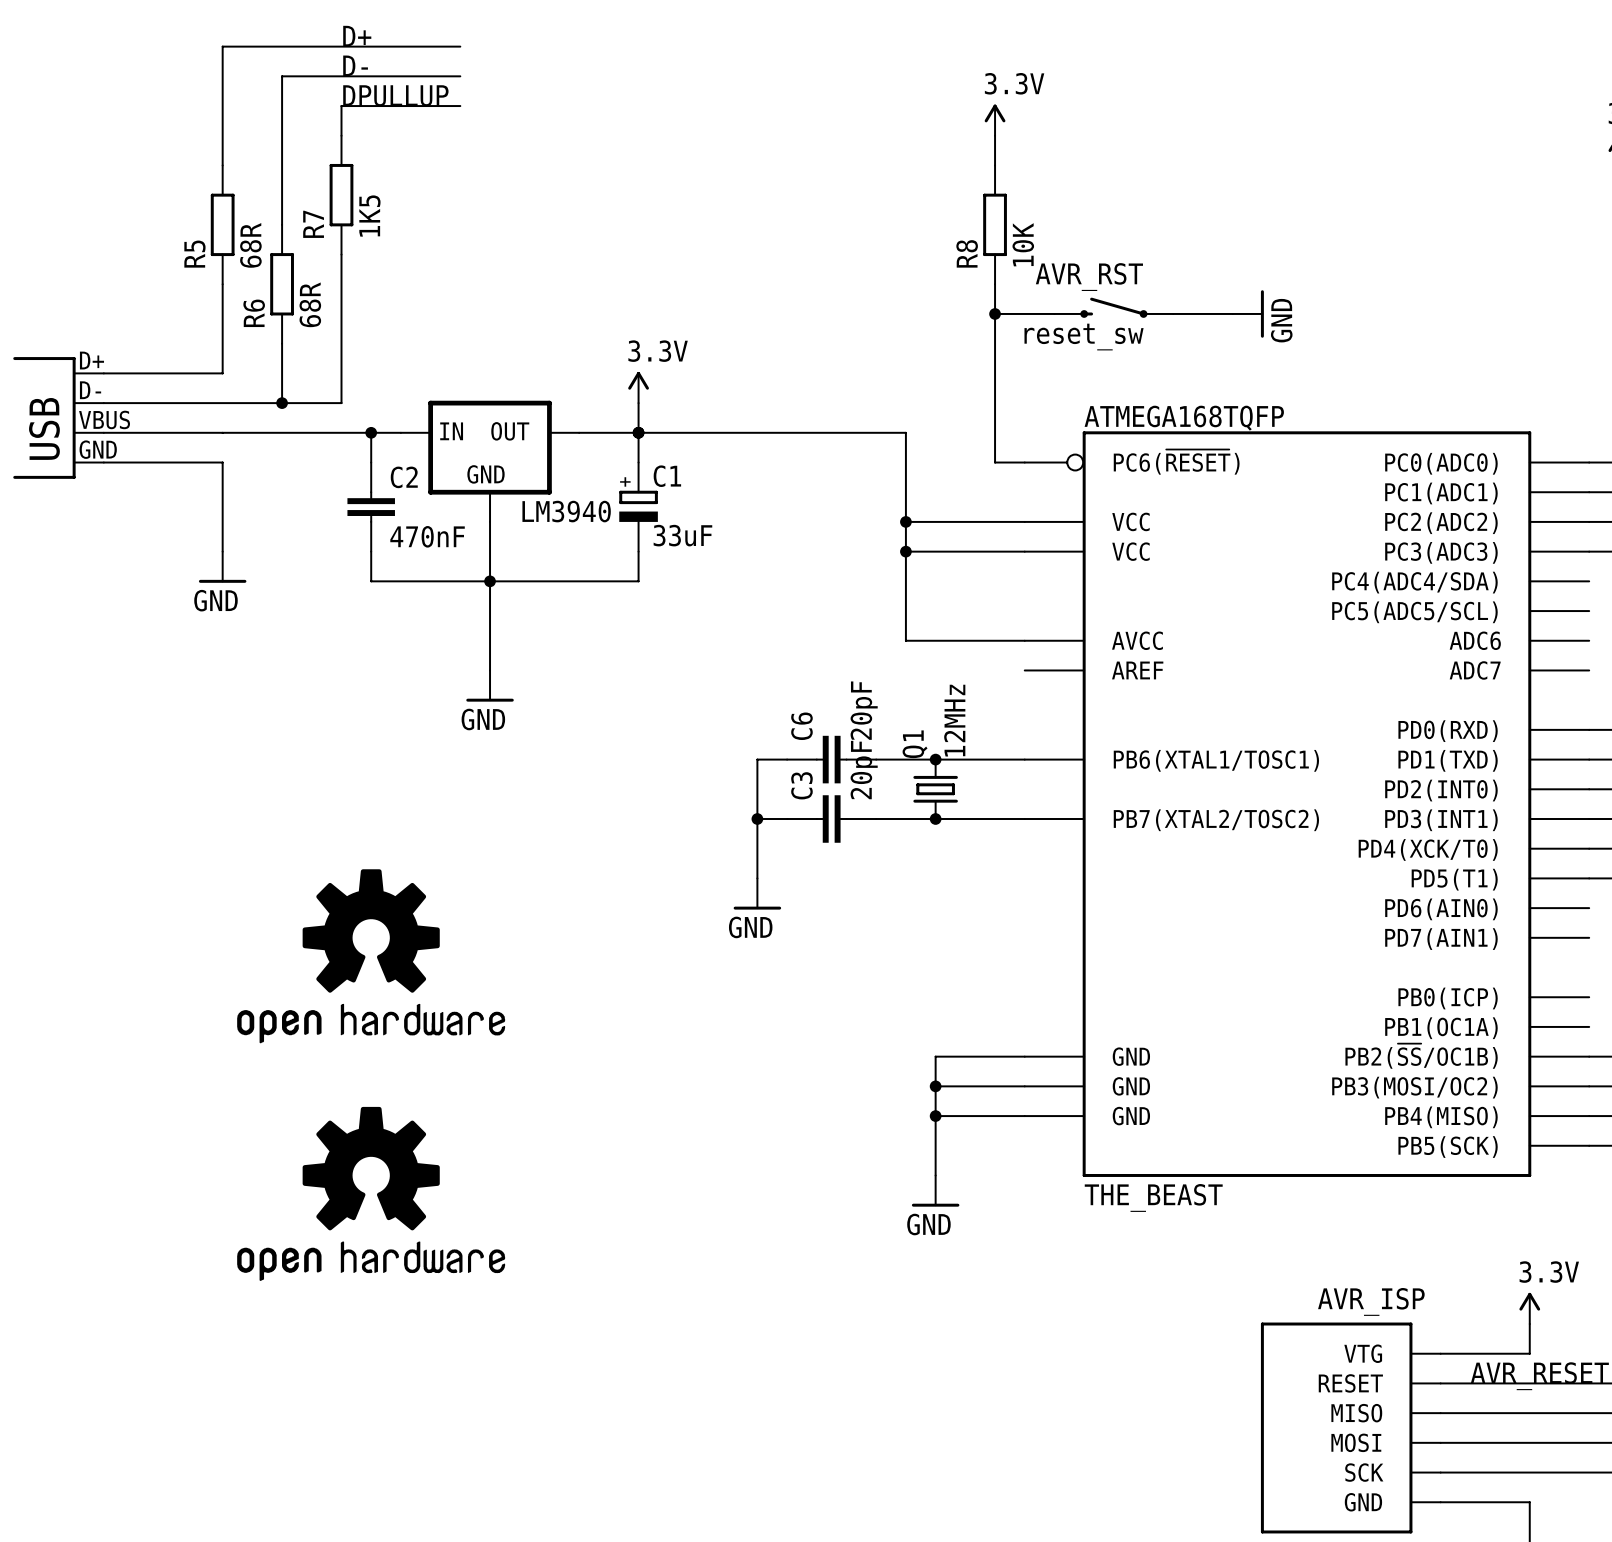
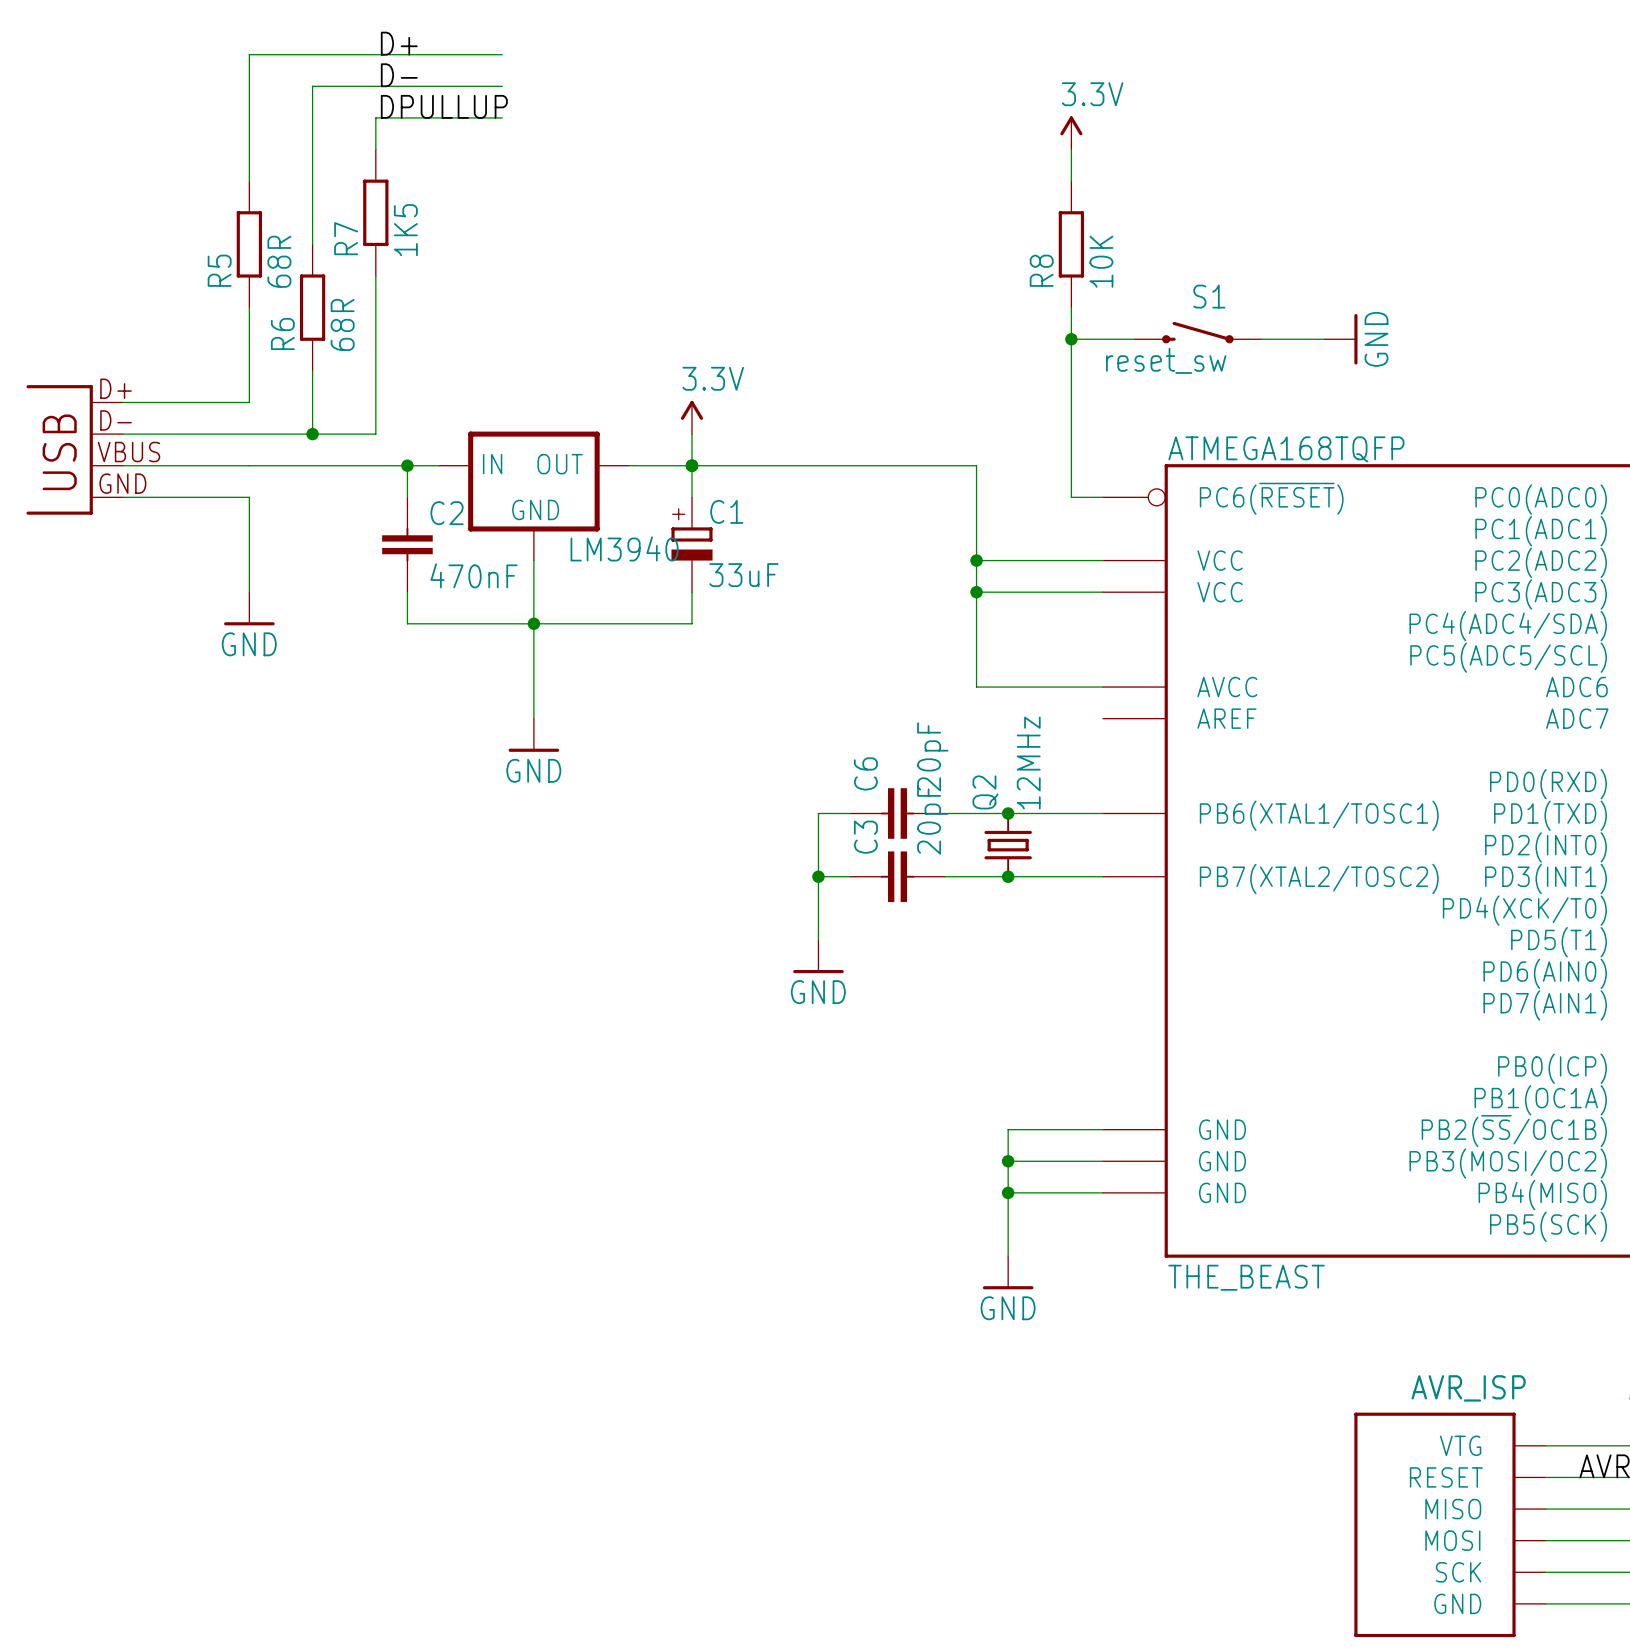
AVR_RST name: AVR_RST (1089, 277) -> S1 (1209, 296)
Q1 name: Q1 (915, 744) -> Q2 (985, 792)
part: (371, 956) -> none
part: (371, 1193) -> none

